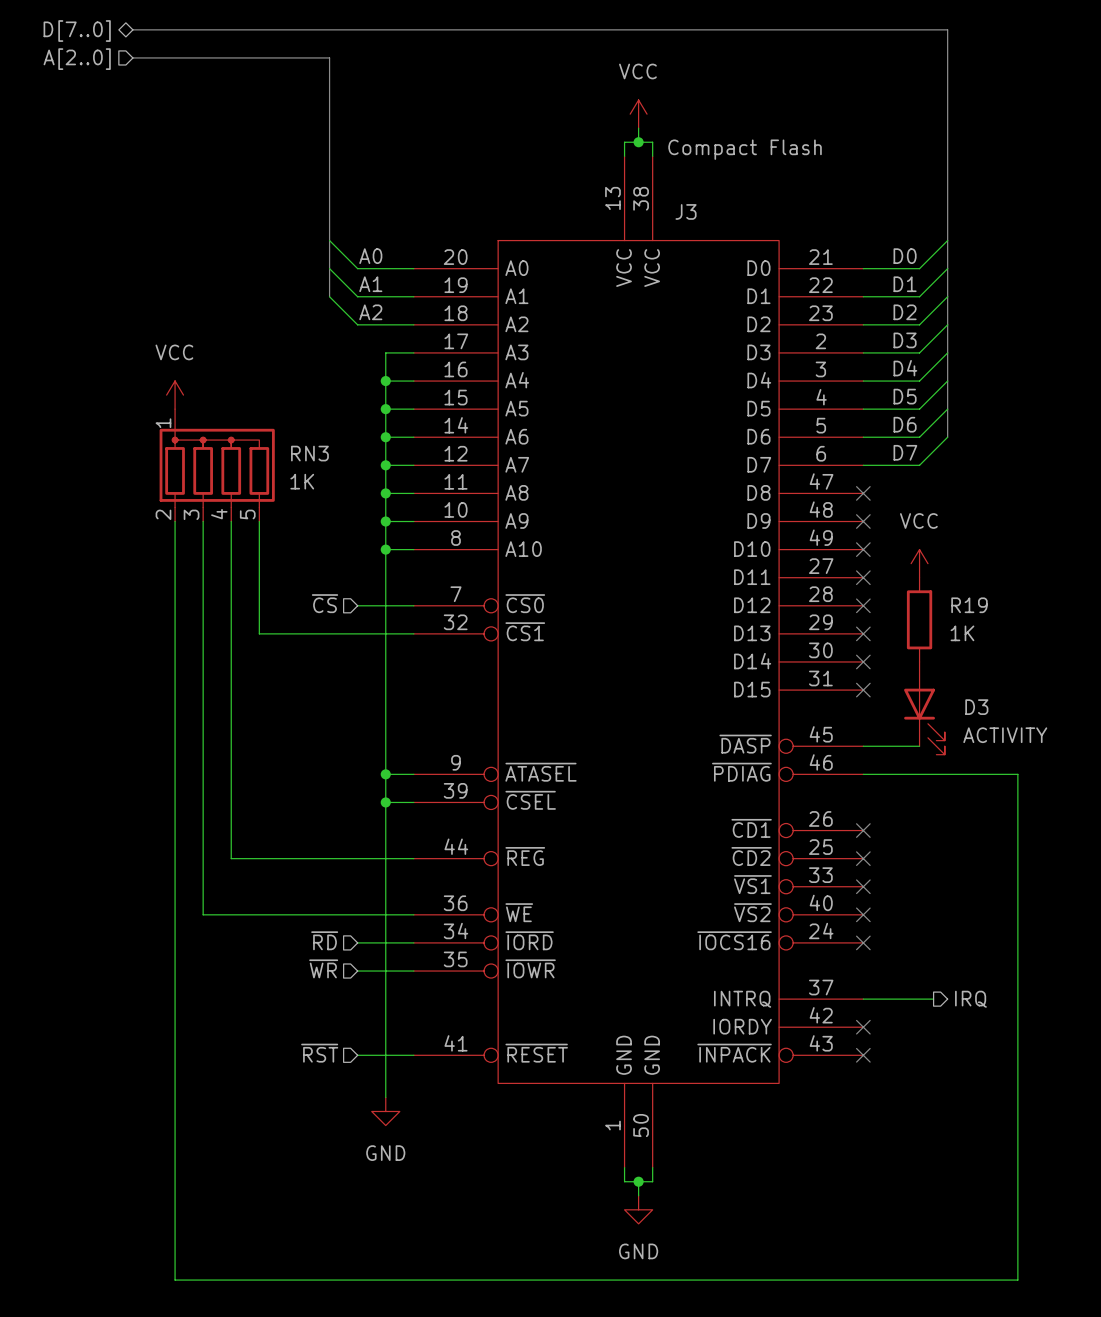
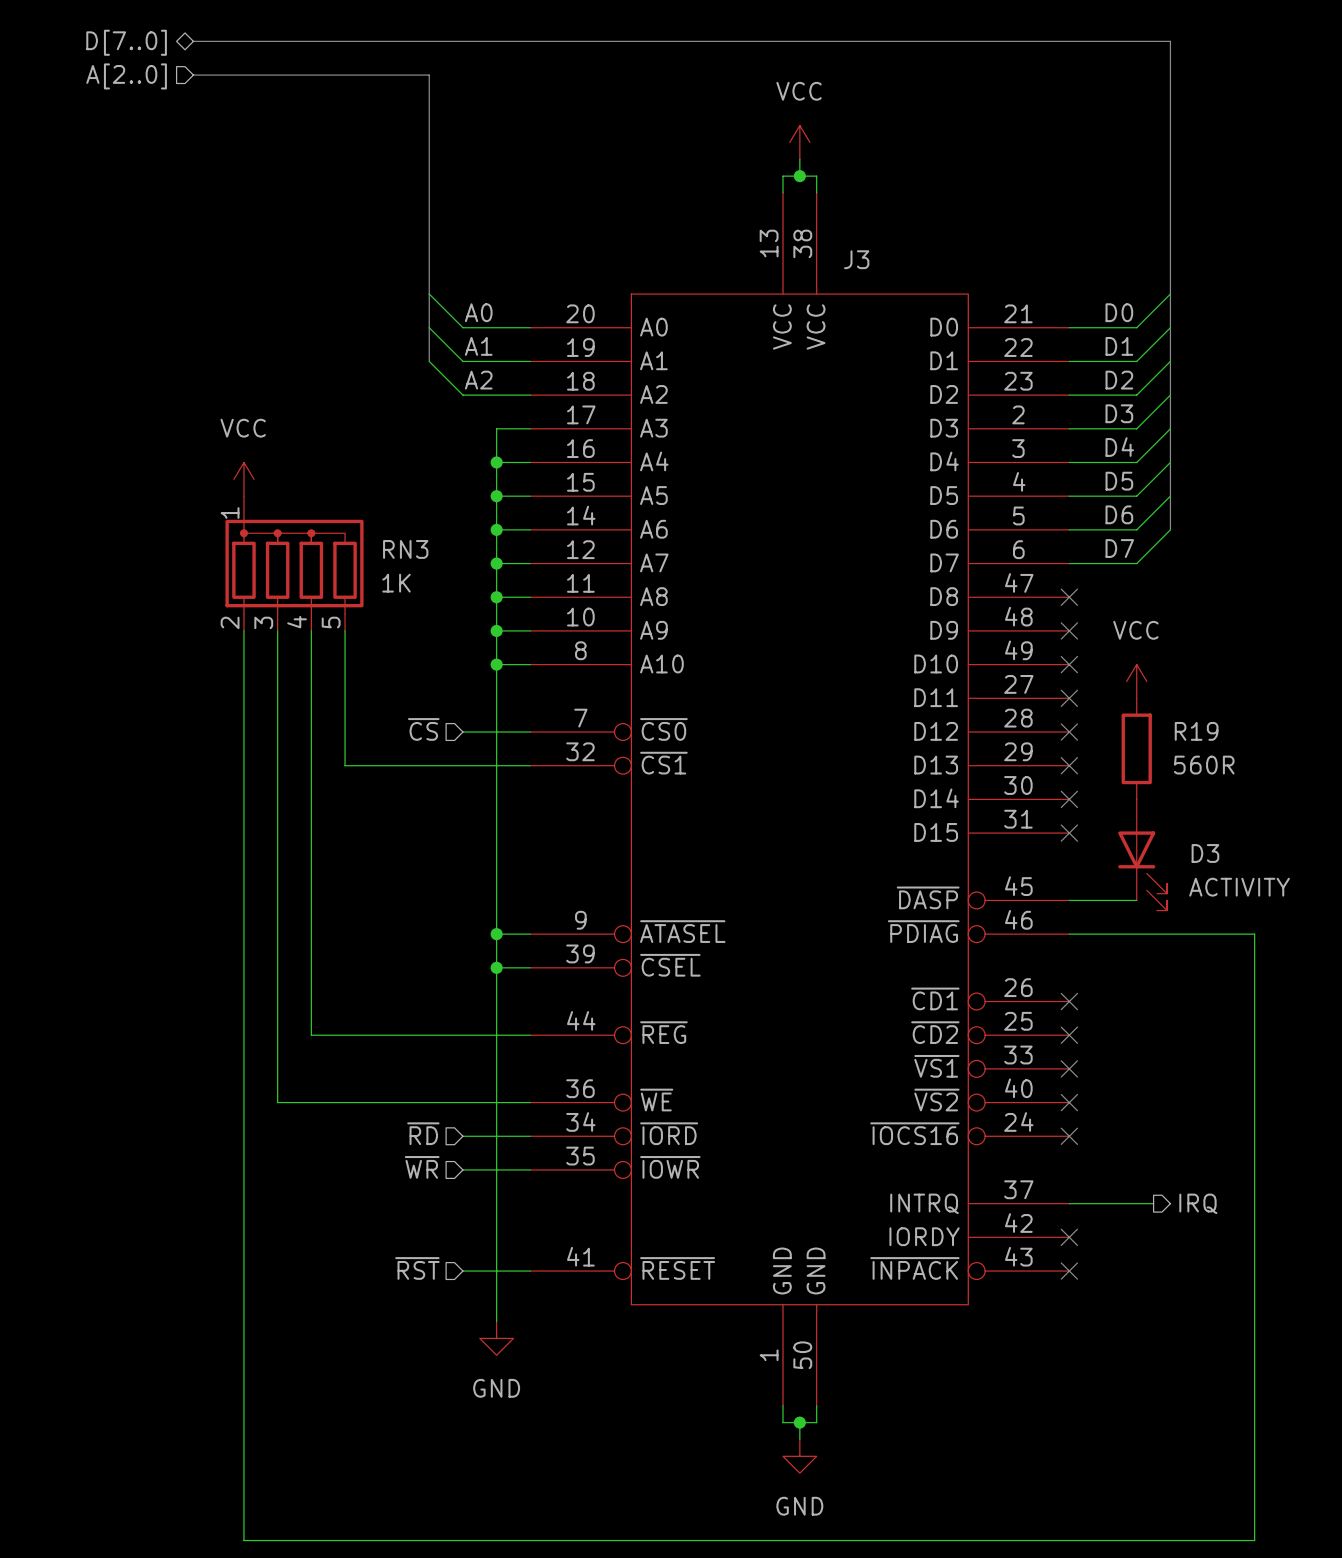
J3 value: Compact Flash (745, 149) -> none
R19 value: 1K (962, 633) -> 560R (1204, 765)

